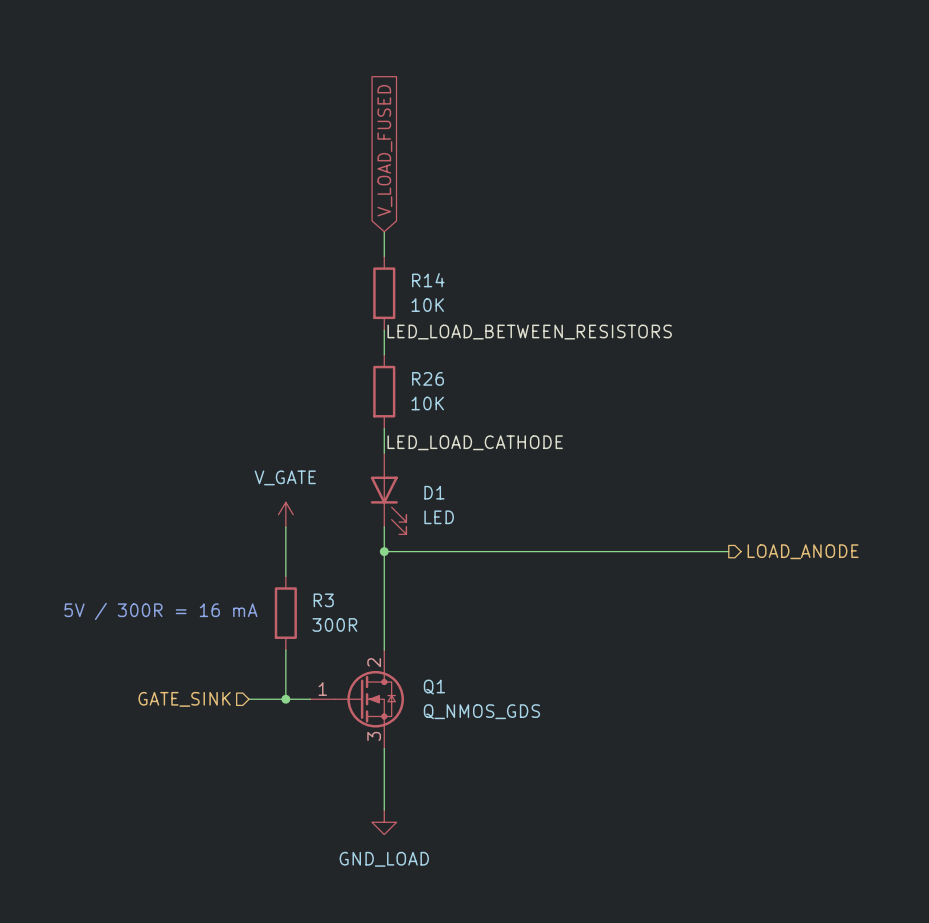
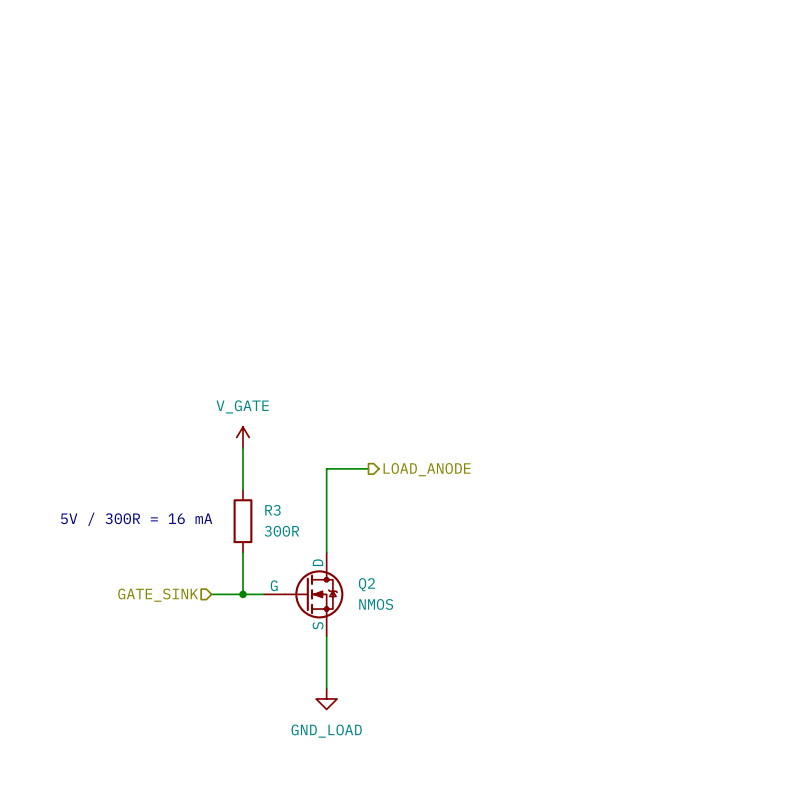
global label: V_LOAD_FUSED (384, 150) -> none
wire: (384, 231) (384, 256) -> none
R14: 10K (384, 293) -> none
wire: (384, 330) (384, 354) -> none
label: LED_LOAD_BETWEEN_RESISTORS (529, 332) -> none
R26: 10K (384, 391) -> none
wire: (384, 428) (384, 453) -> none
label: LED_LOAD_CATHODE (475, 442) -> none
D1: LED (388, 493) -> none
wire: (384, 526) (384, 551) -> none
junction: (384, 551) -> none
wire: (433, 551) (728, 551) -> none
hierarchical label: none -> LOAD_ANODE (427, 469)
hierarchical label: LOAD_ANODE (803, 551) -> none
Q1: Q_NMOS_GDS (357, 699) -> none
Q2: none -> NMOS (303, 594)

